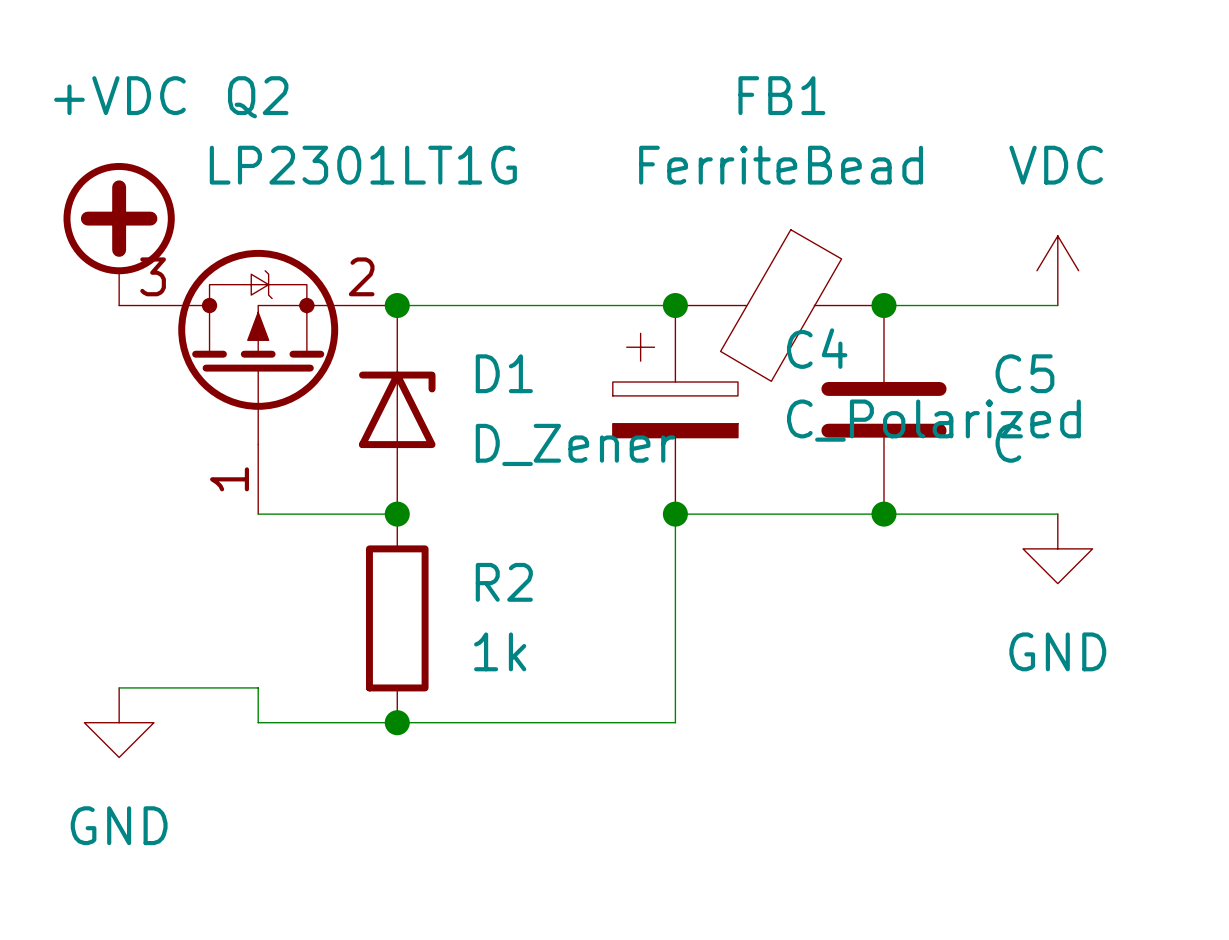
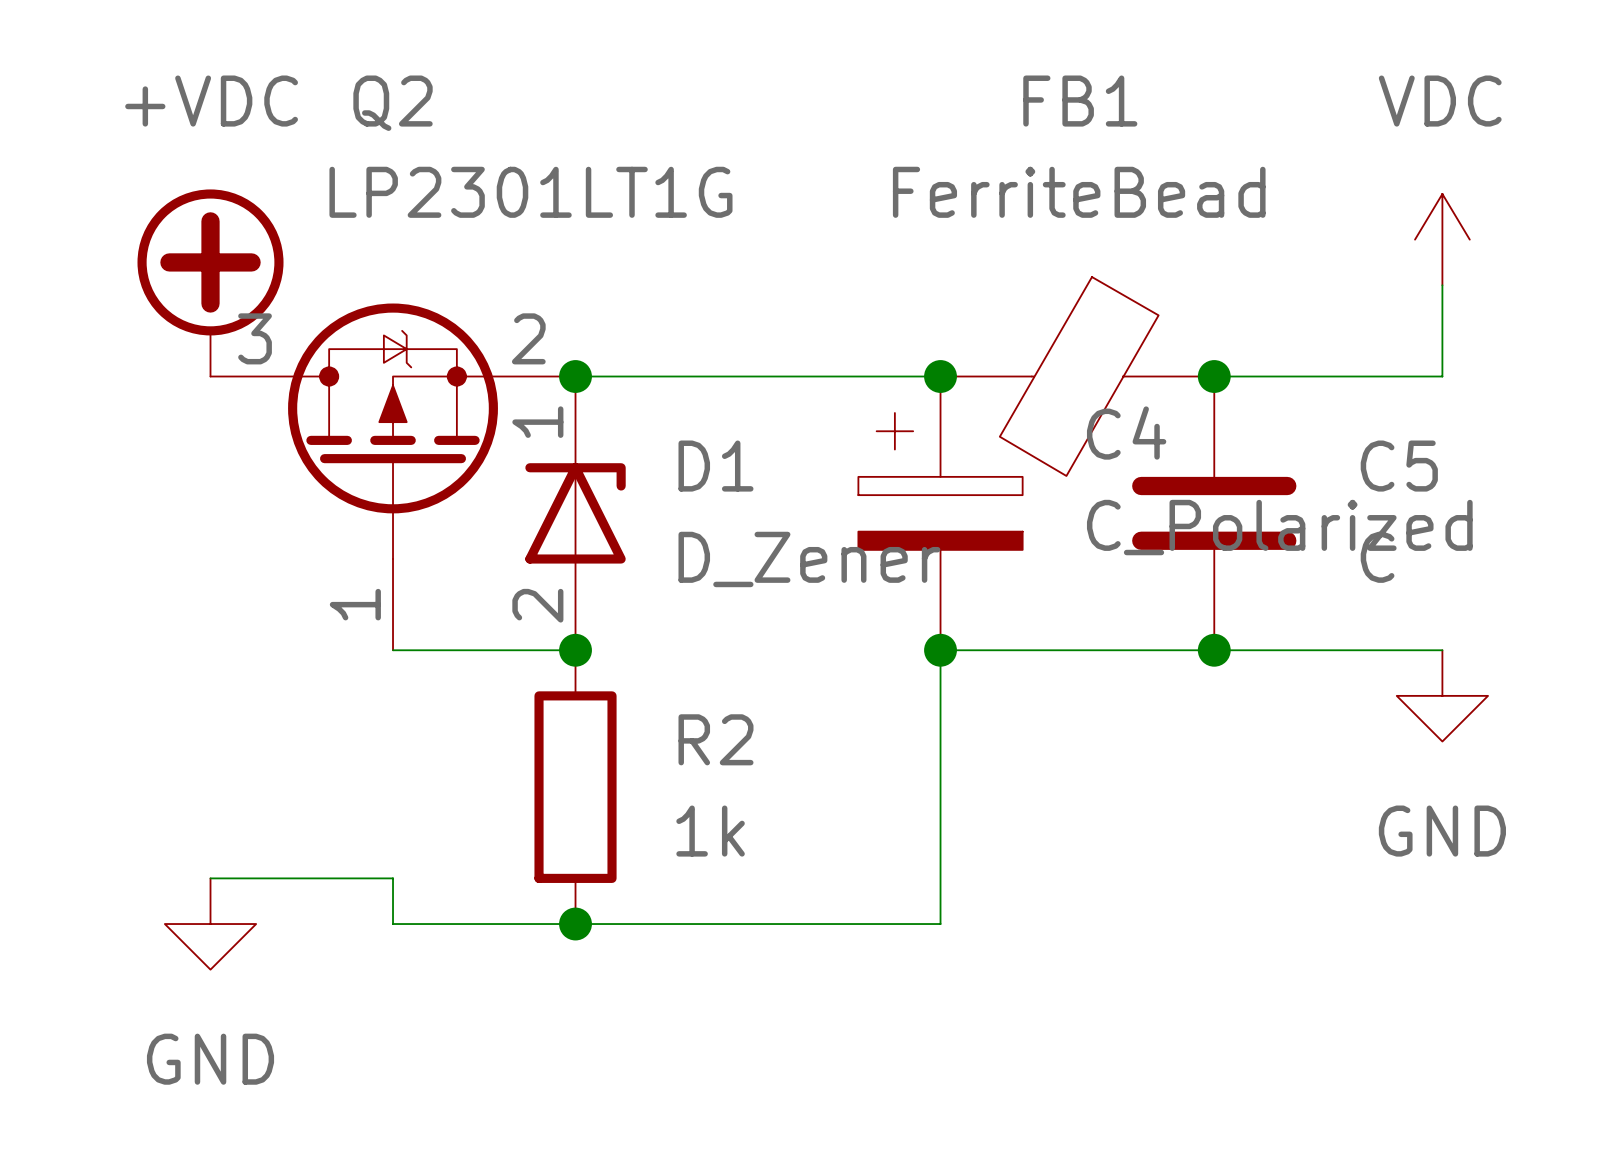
power symbol position: VDC (1057, 270) -> VDC (1442, 239)
D1 pin number: none -> 1 (537, 422)
D1 pin number: none -> 2 (537, 605)

